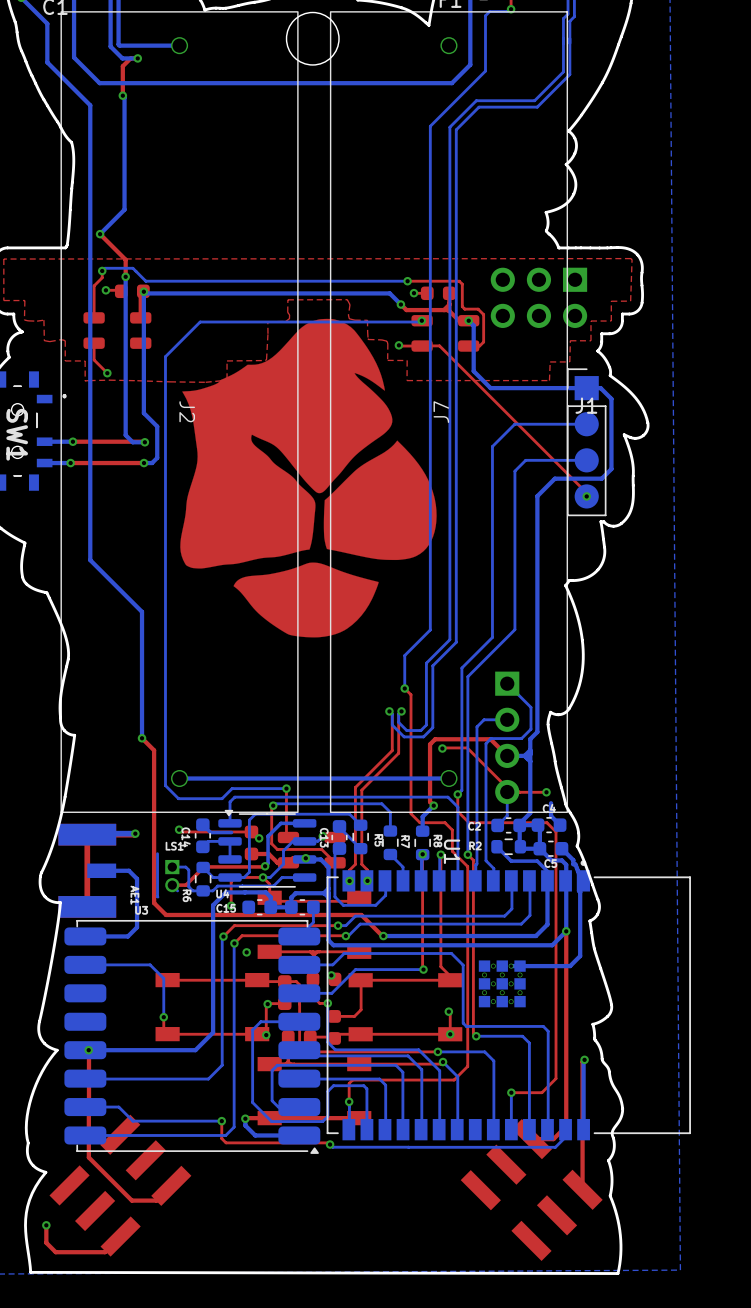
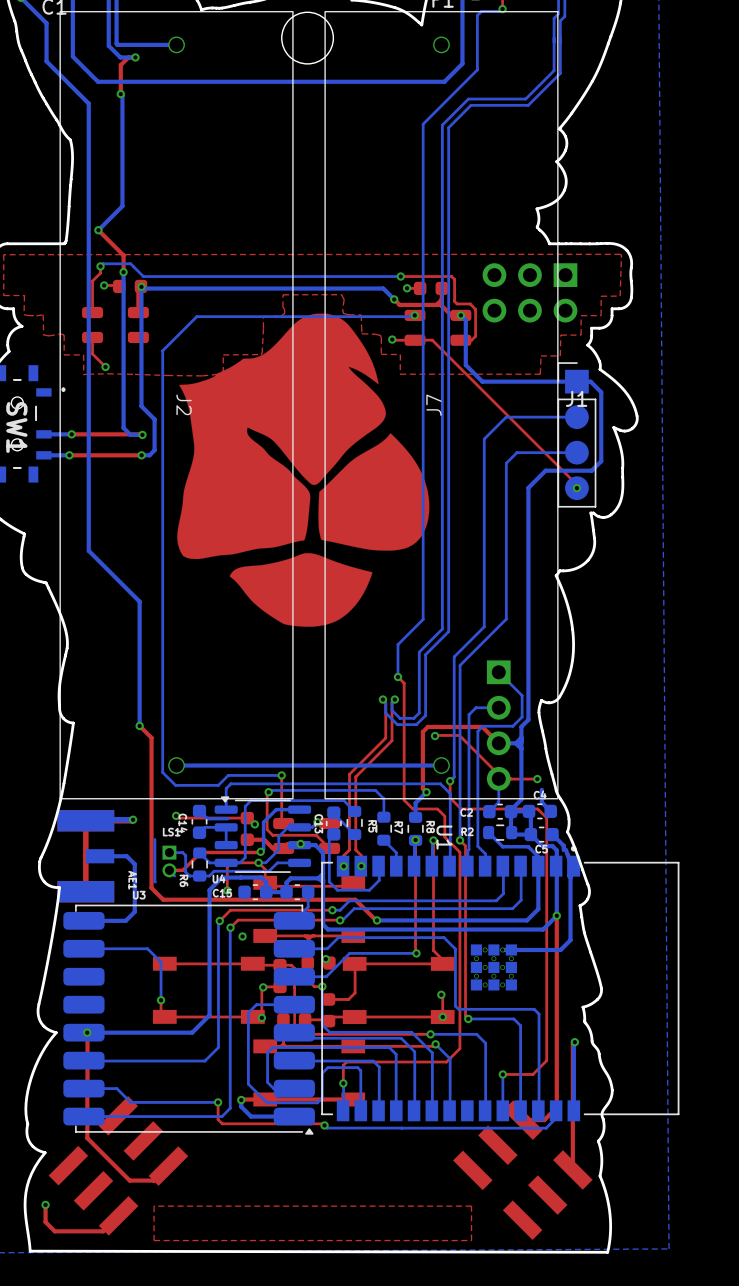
top zone outline: none -> (471, 1206) (154, 1206) (154, 1240) (471, 1240) (471, 1206)

